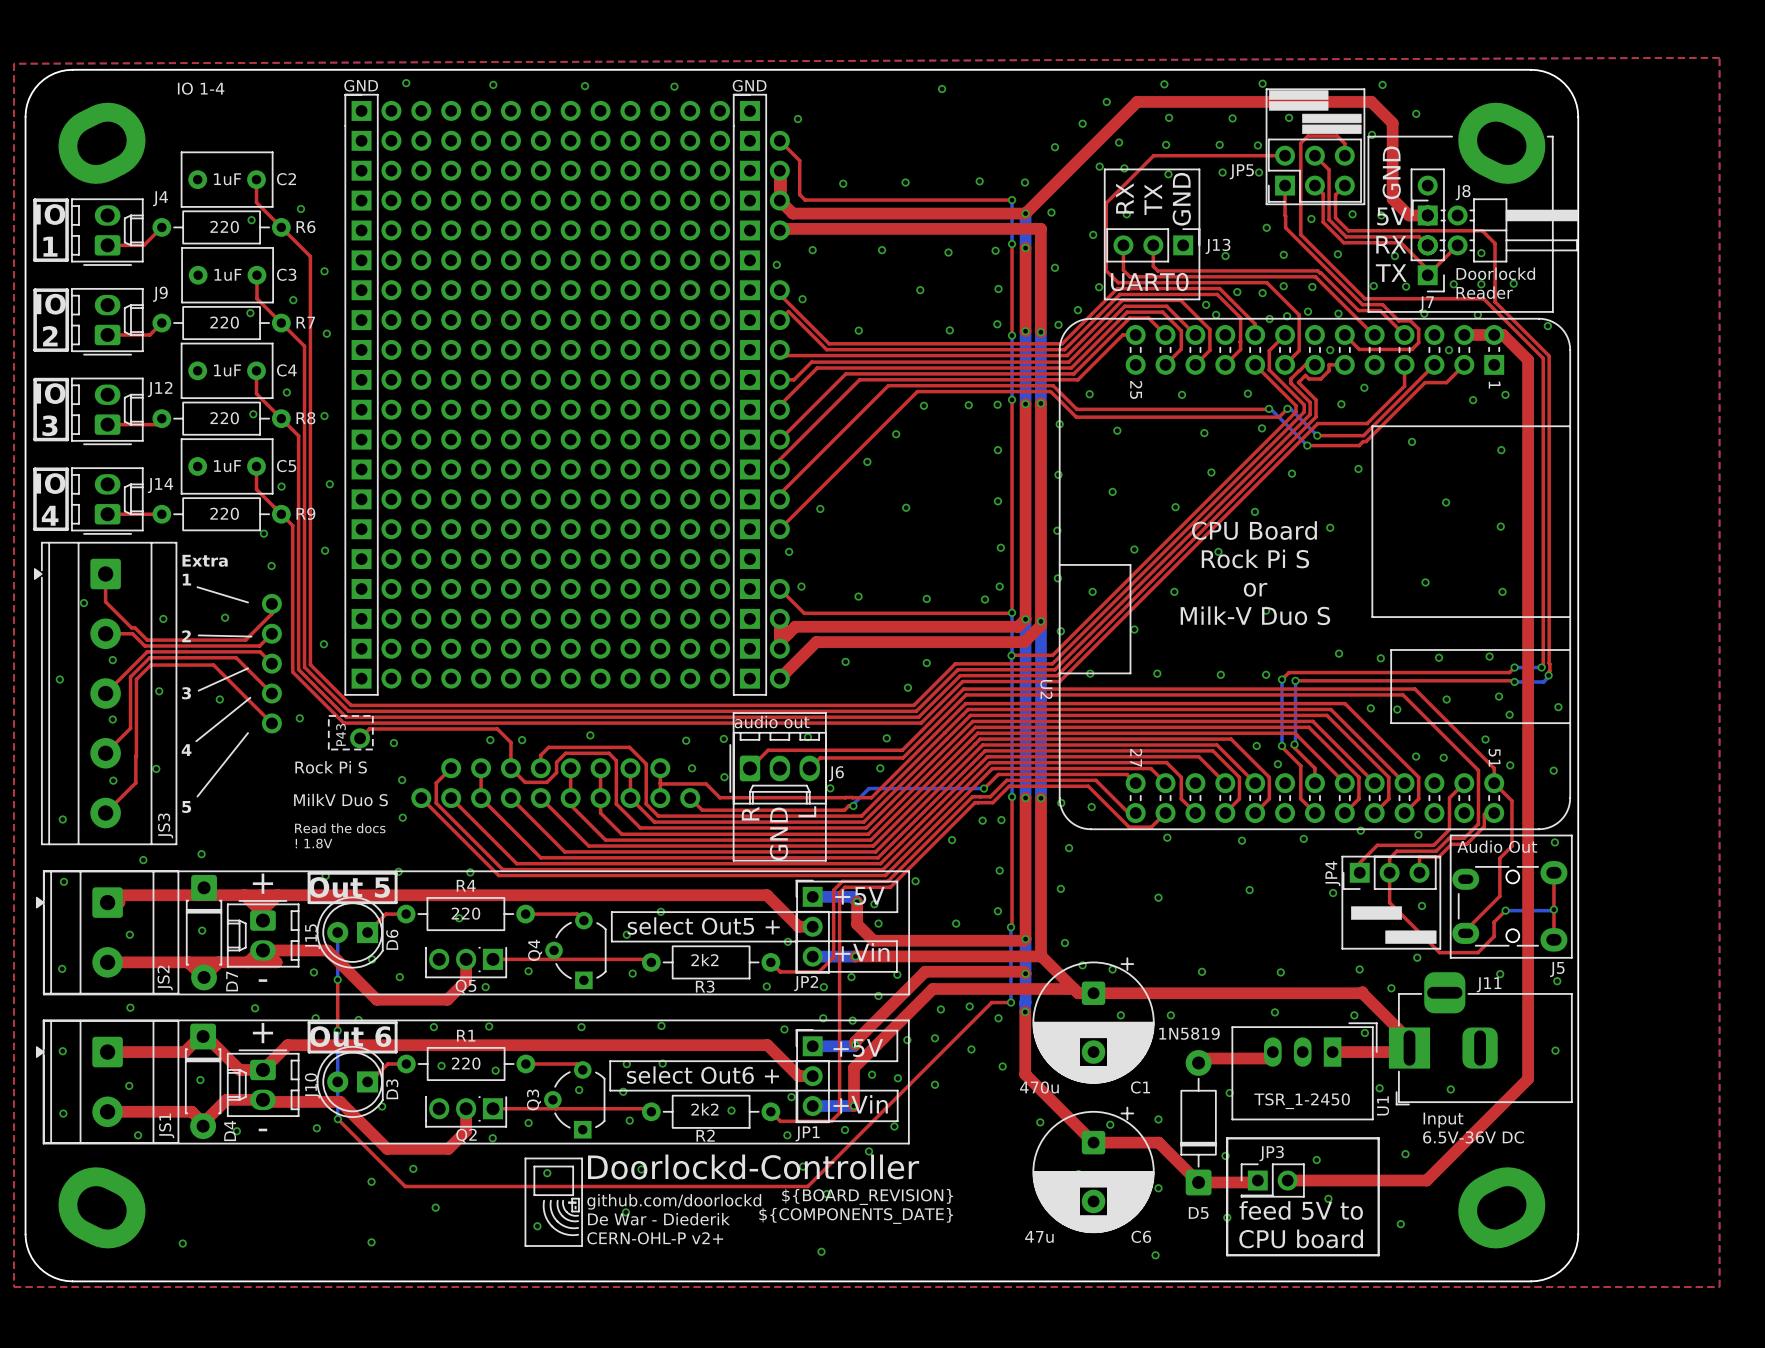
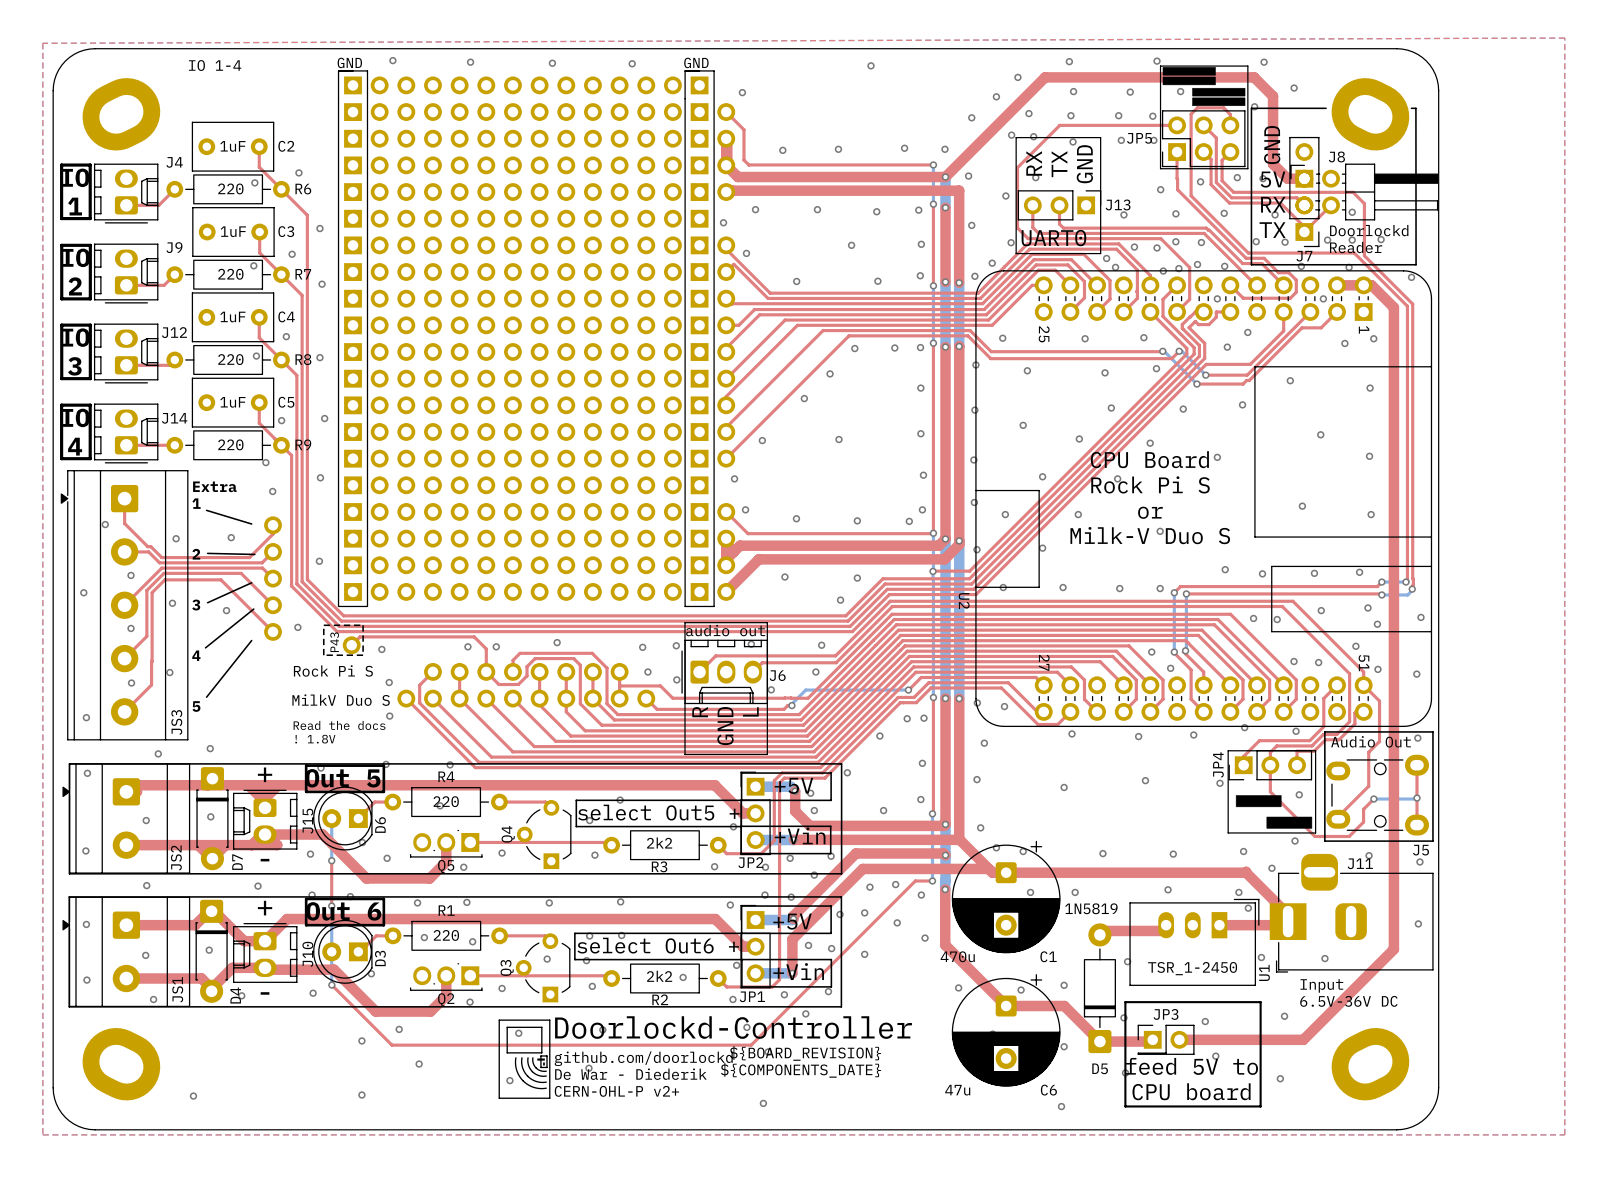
Q5 footprint: [425, 947, 507, 979] -> [409, 829, 483, 858]
Q2 footprint: [425, 1096, 507, 1128] -> [409, 963, 483, 991]

